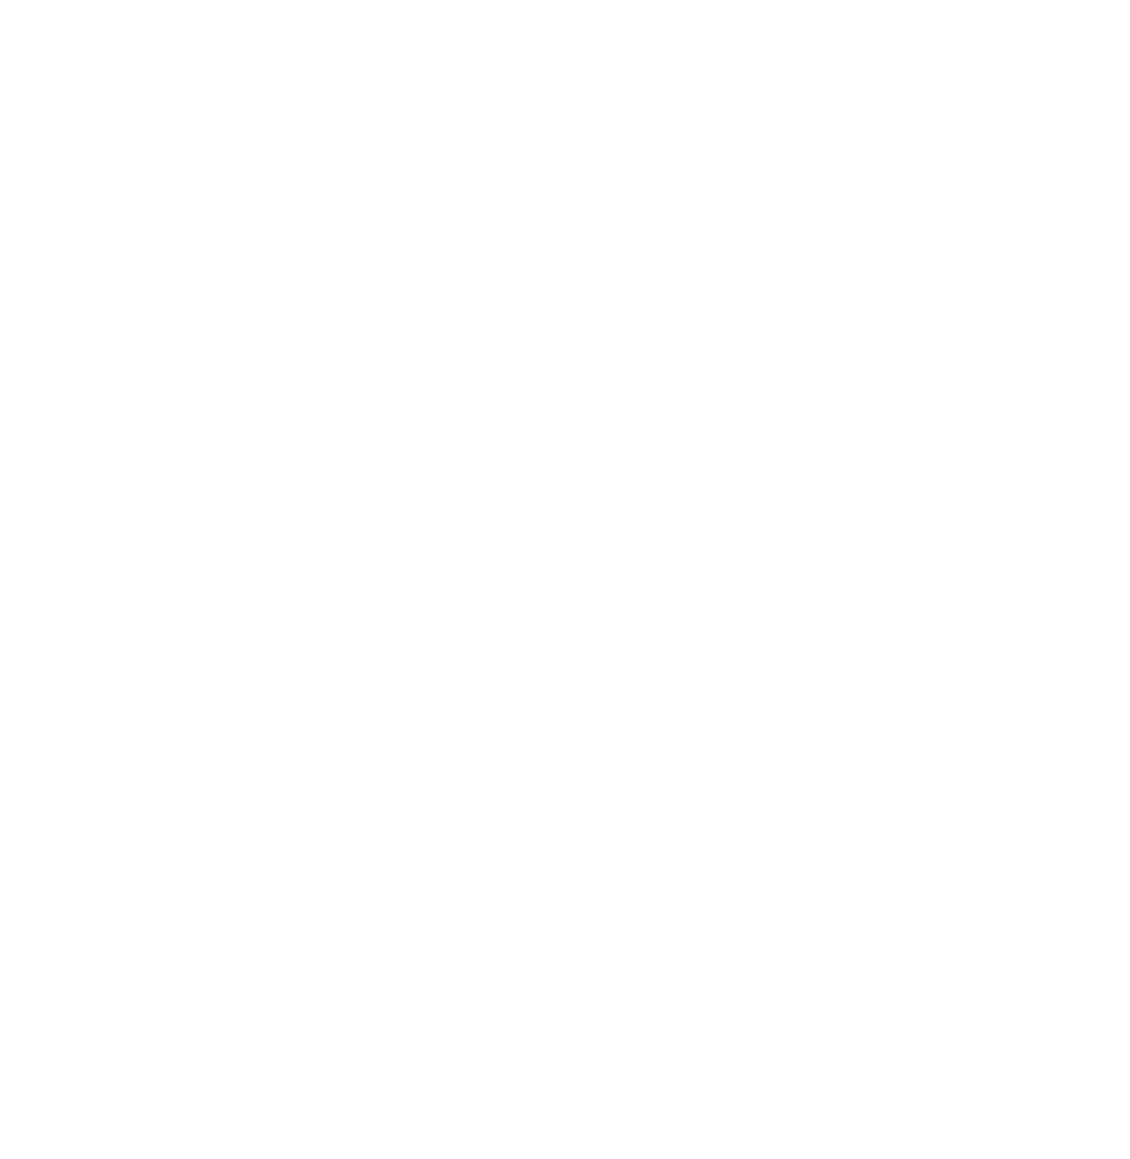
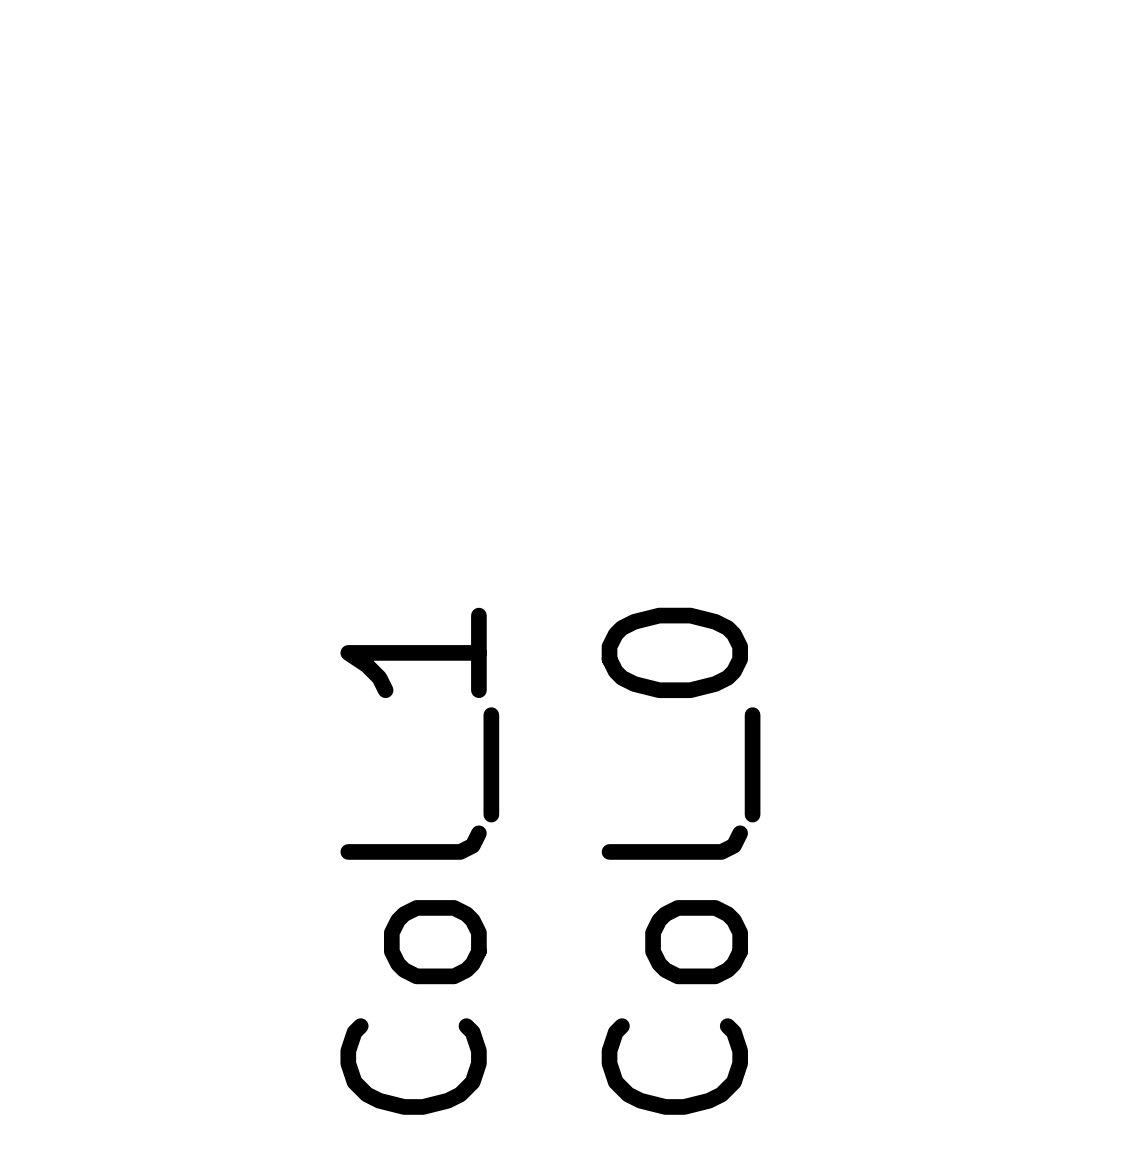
label: none -> Col_1 (419, 861)
label: none -> Col_0 (681, 861)

